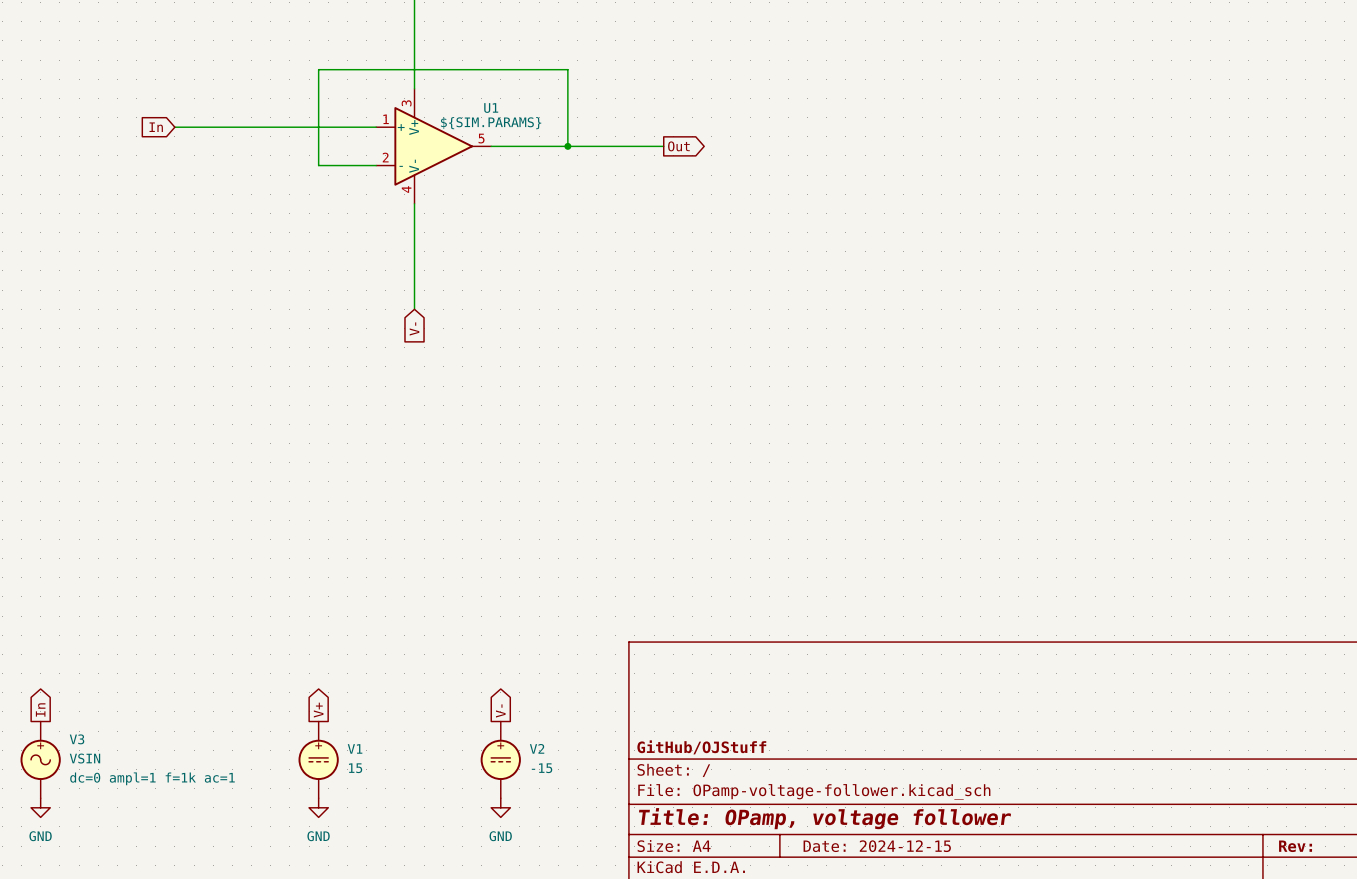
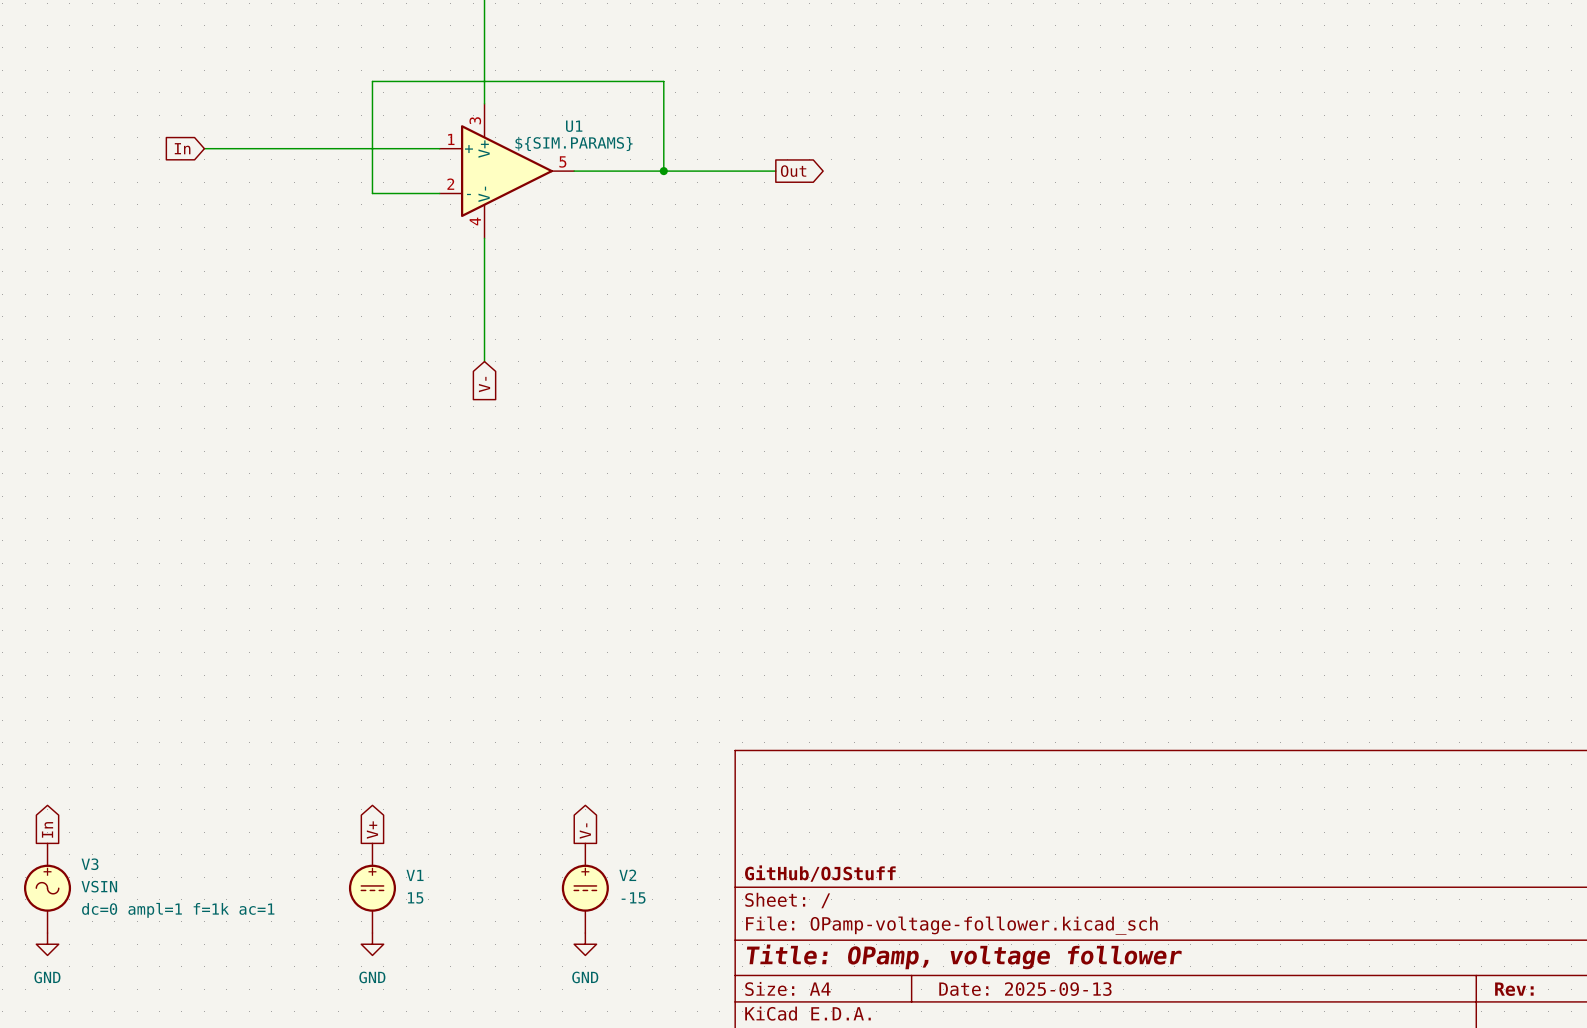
title block: Date: 2024-12-15 (877, 846) -> Date: 2025-09-13 (1025, 989)

